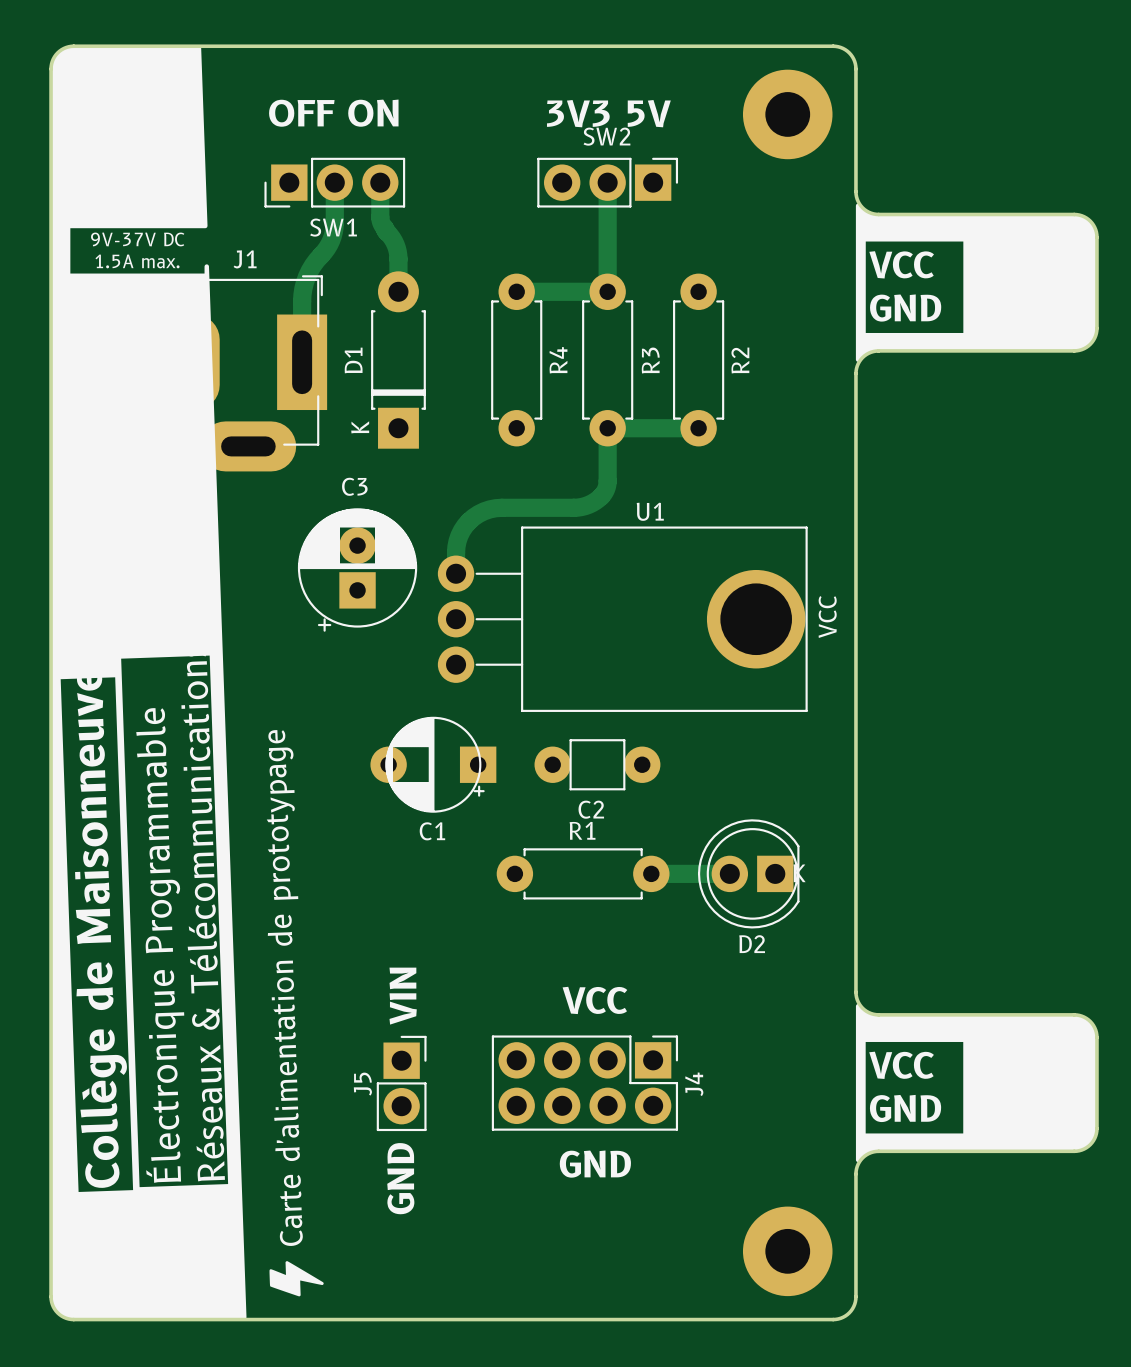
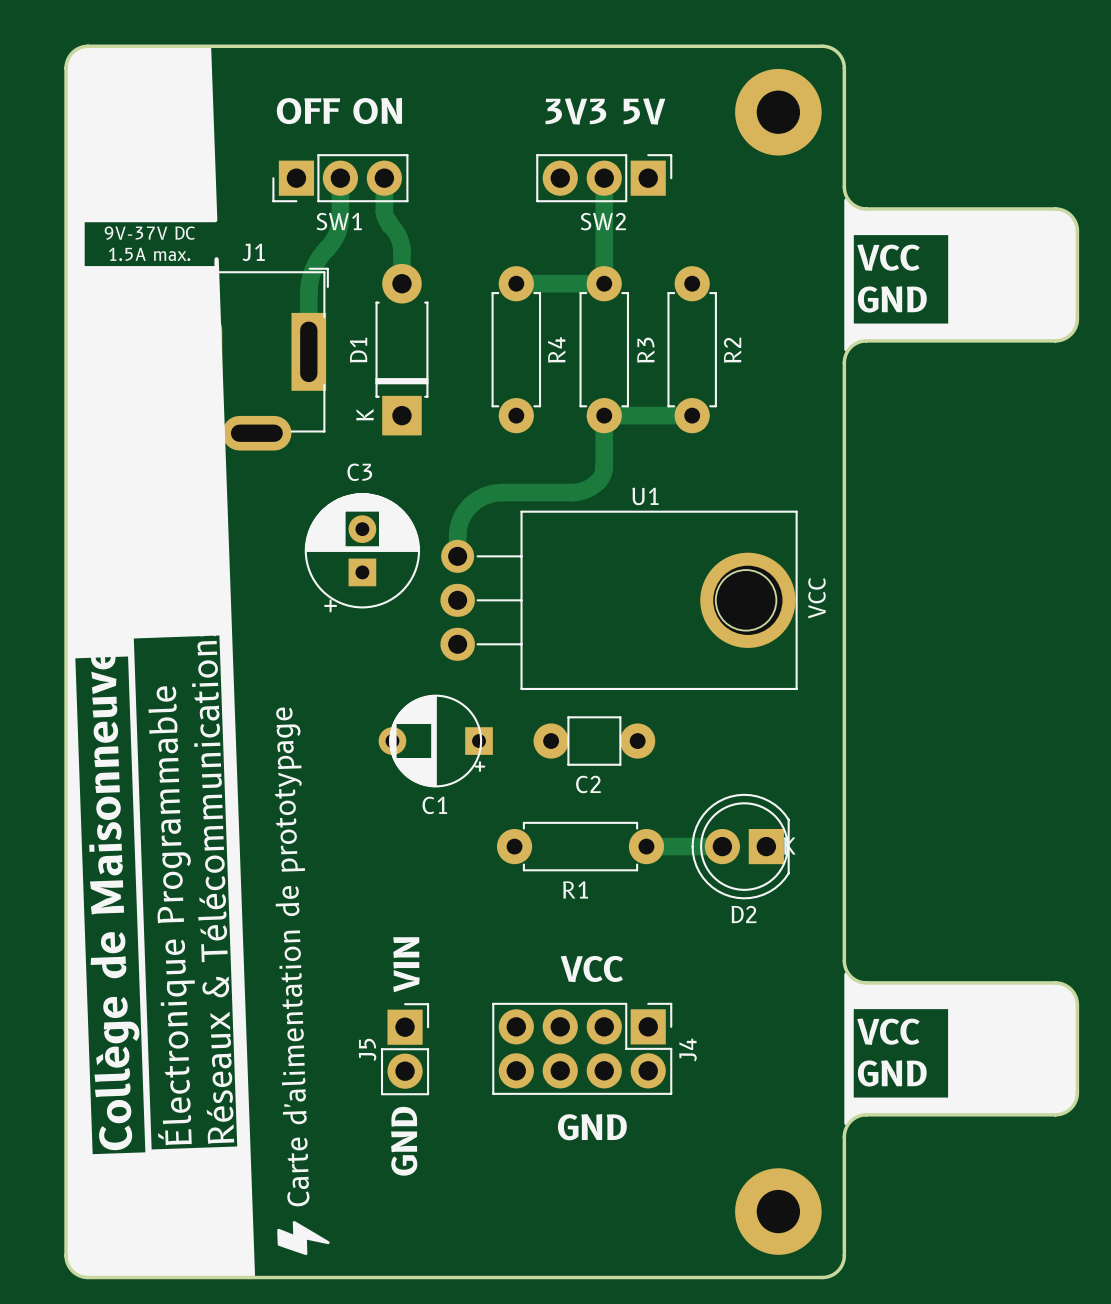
SW2 name position: SW2 (606, 136) -> SW2 (603, 221)
J1 footprint: [53, 275, 328, 472] -> [68, 267, 329, 451]
C3 footprint: [297, 508, 418, 632] -> [304, 493, 421, 613]
U1 footprint: [437, 526, 808, 712] -> [440, 510, 798, 691]
C1 footprint: [370, 716, 497, 813] -> [378, 694, 493, 788]
R1 name position: R1 (582, 830) -> R1 (575, 889)

